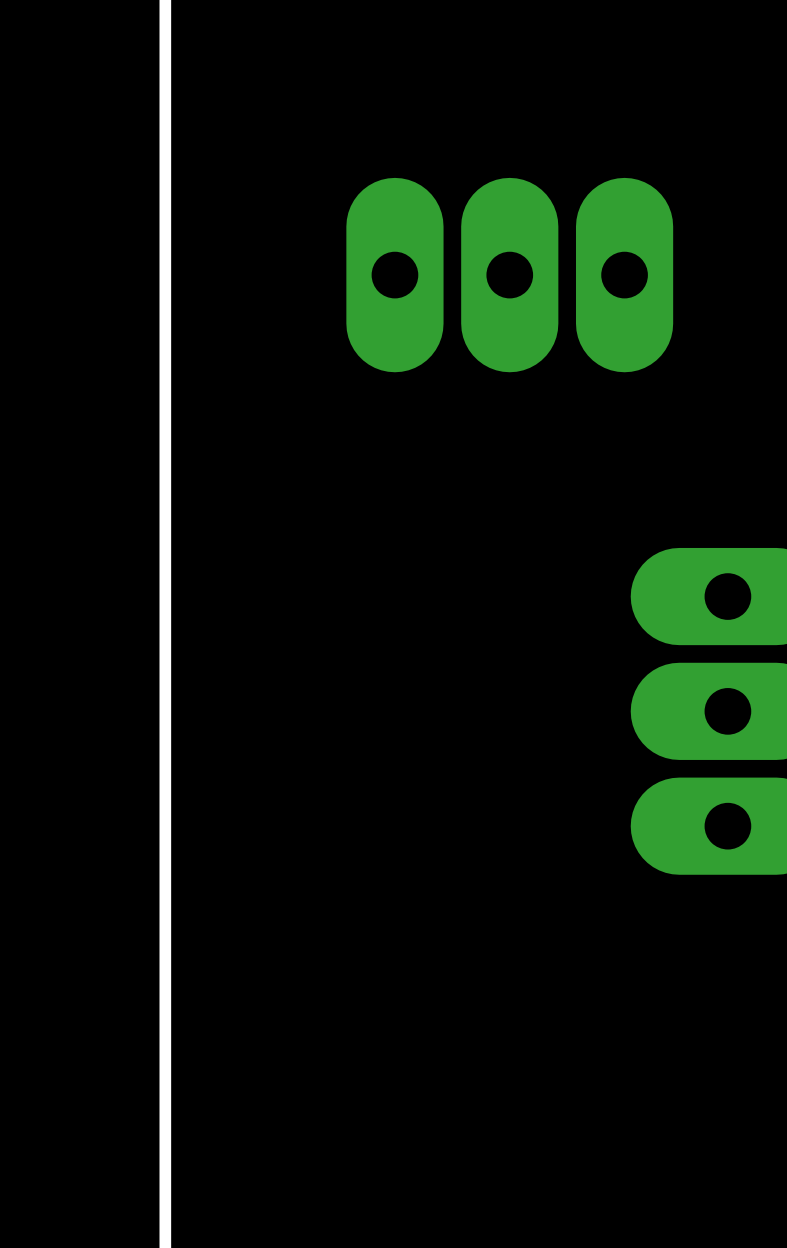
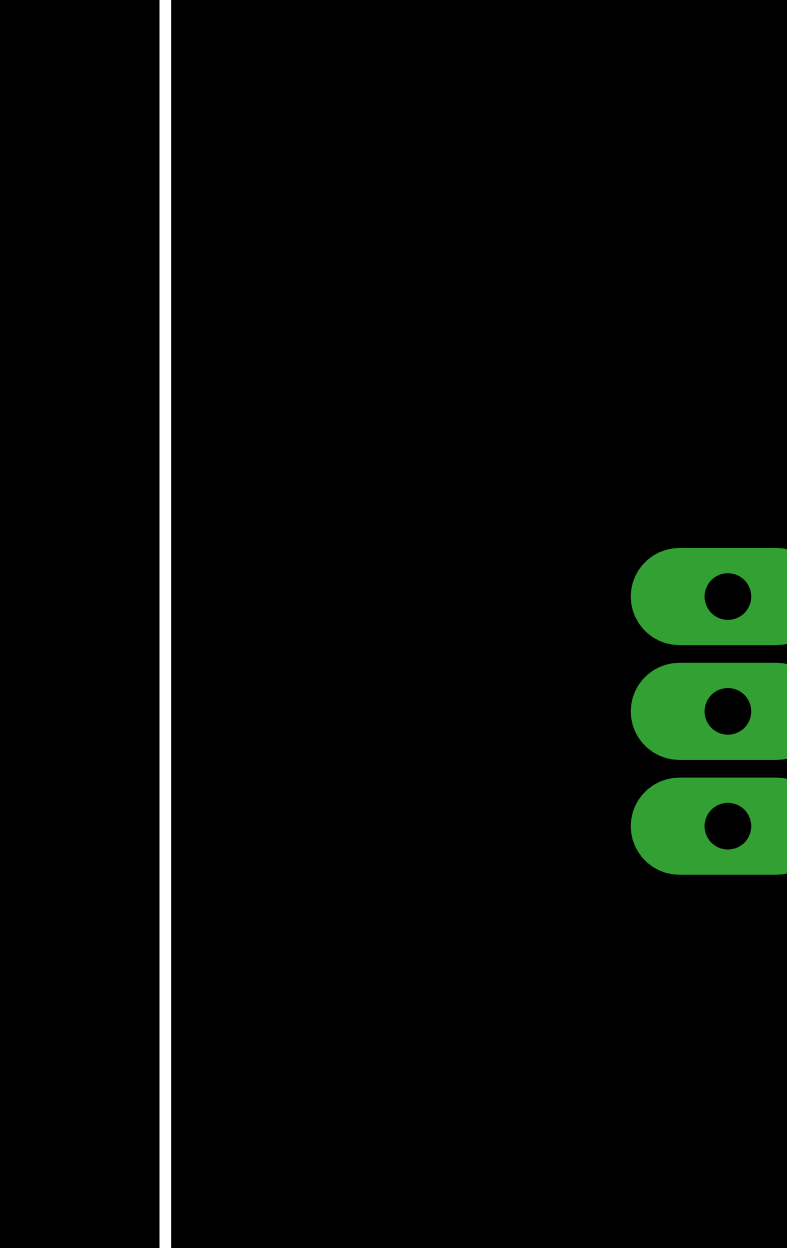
part: (509, 275) -> none

